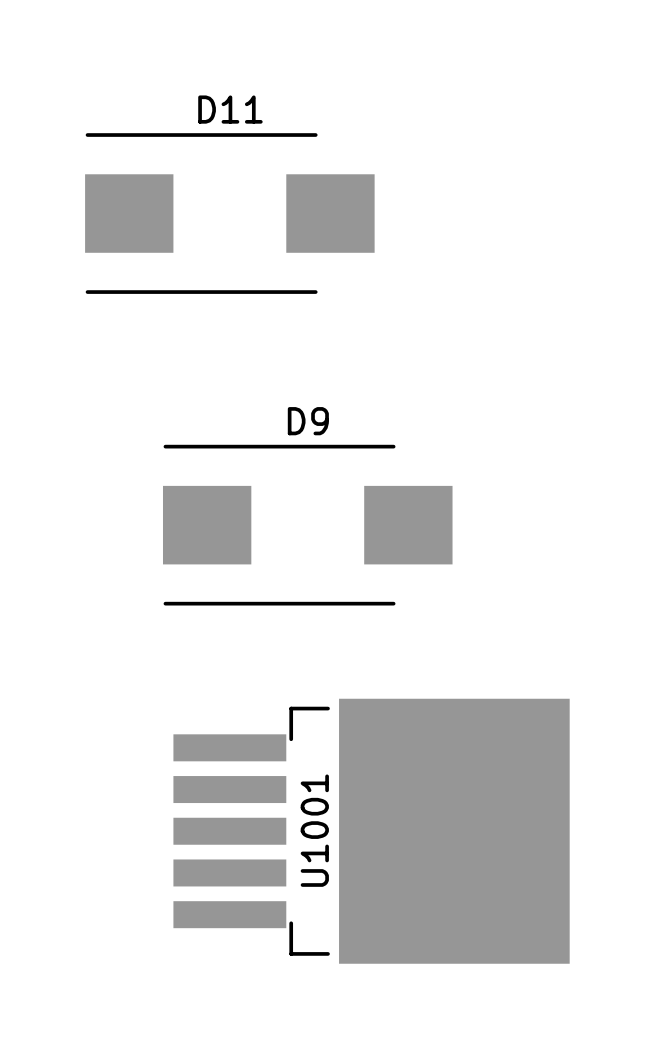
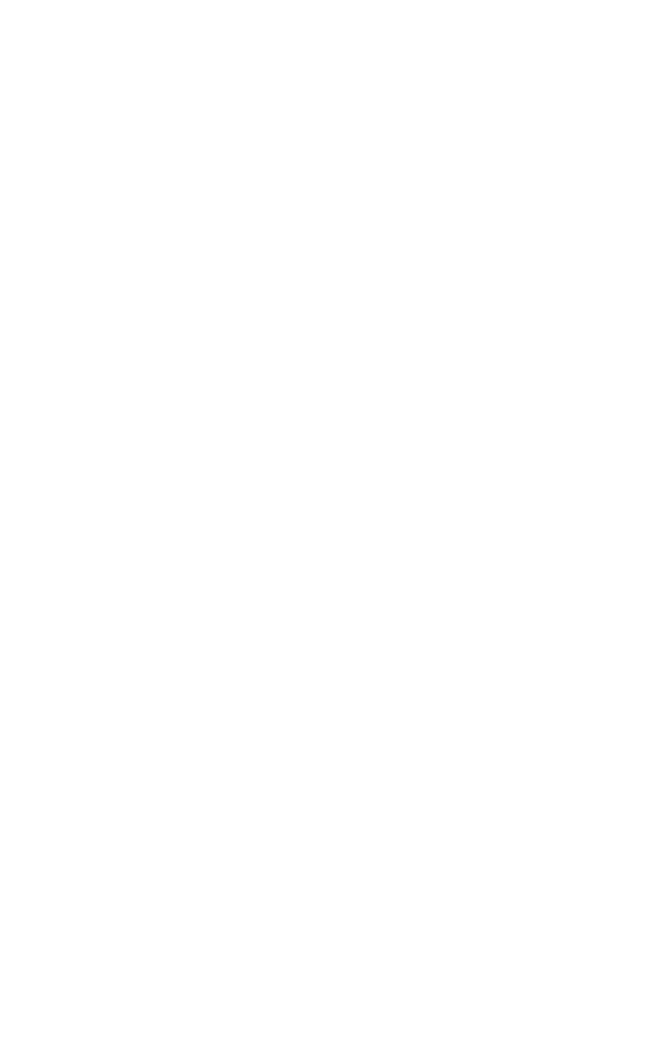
D11: (229, 213) -> none
D9: (307, 525) -> none
U1001: (371, 831) -> none

